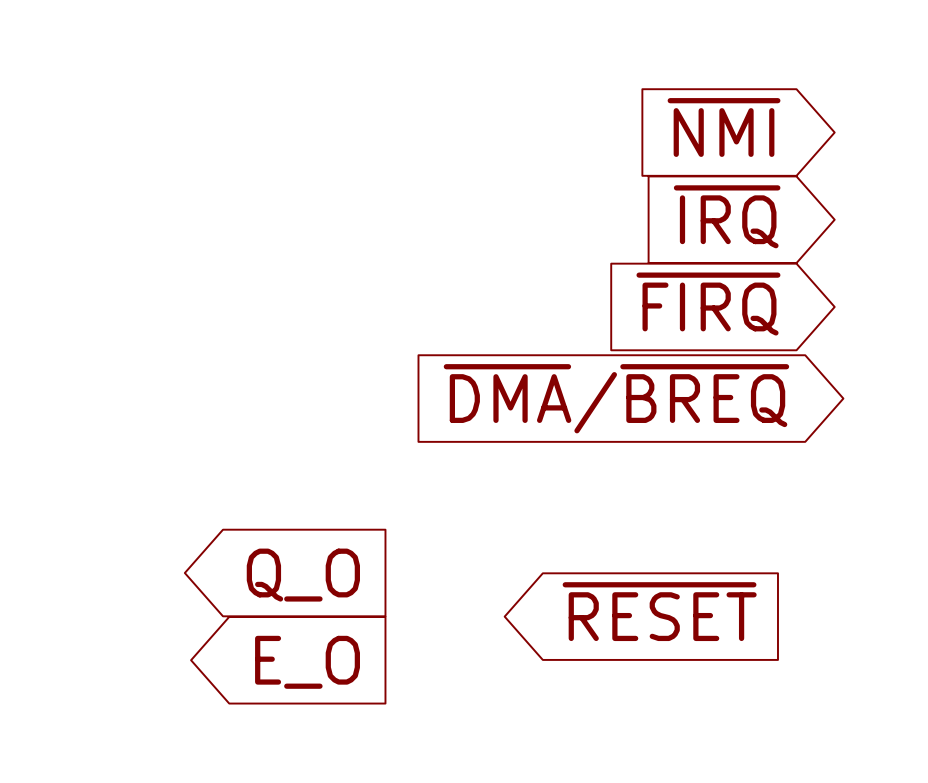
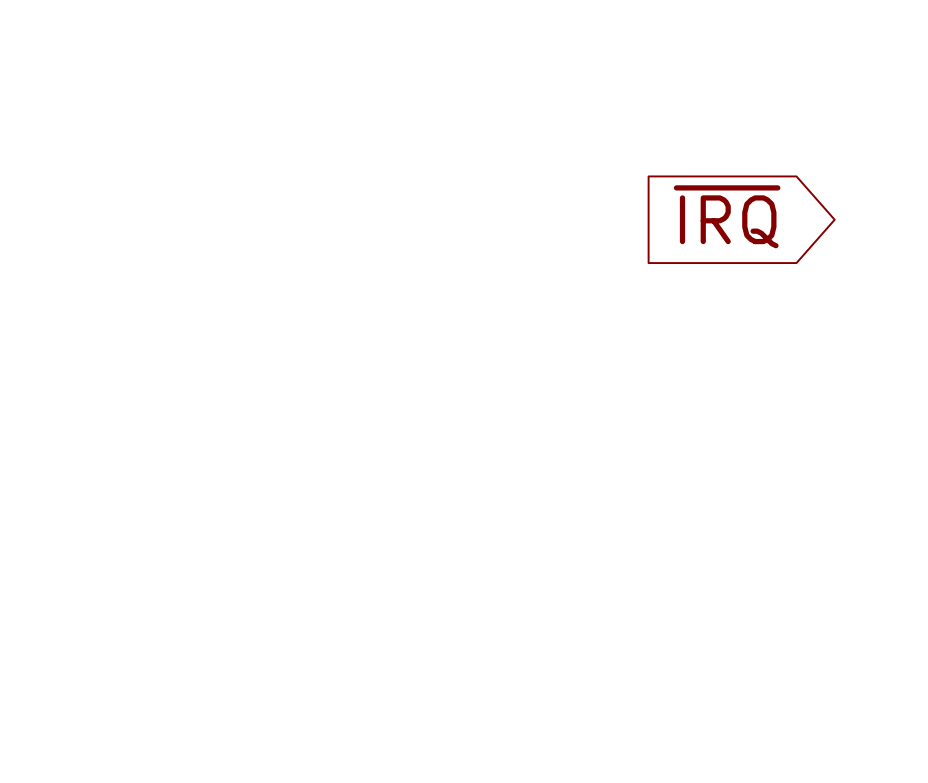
global label: ~{NMI} (724, 127) -> none
global label: ~{FIRQ} (708, 304) -> none
global label: ~{DMA}/~{BREQ} (616, 398) -> none
global label: Q_O (303, 575) -> none
global label: ~{RESET} (659, 611) -> none
global label: E_O (307, 662) -> none

